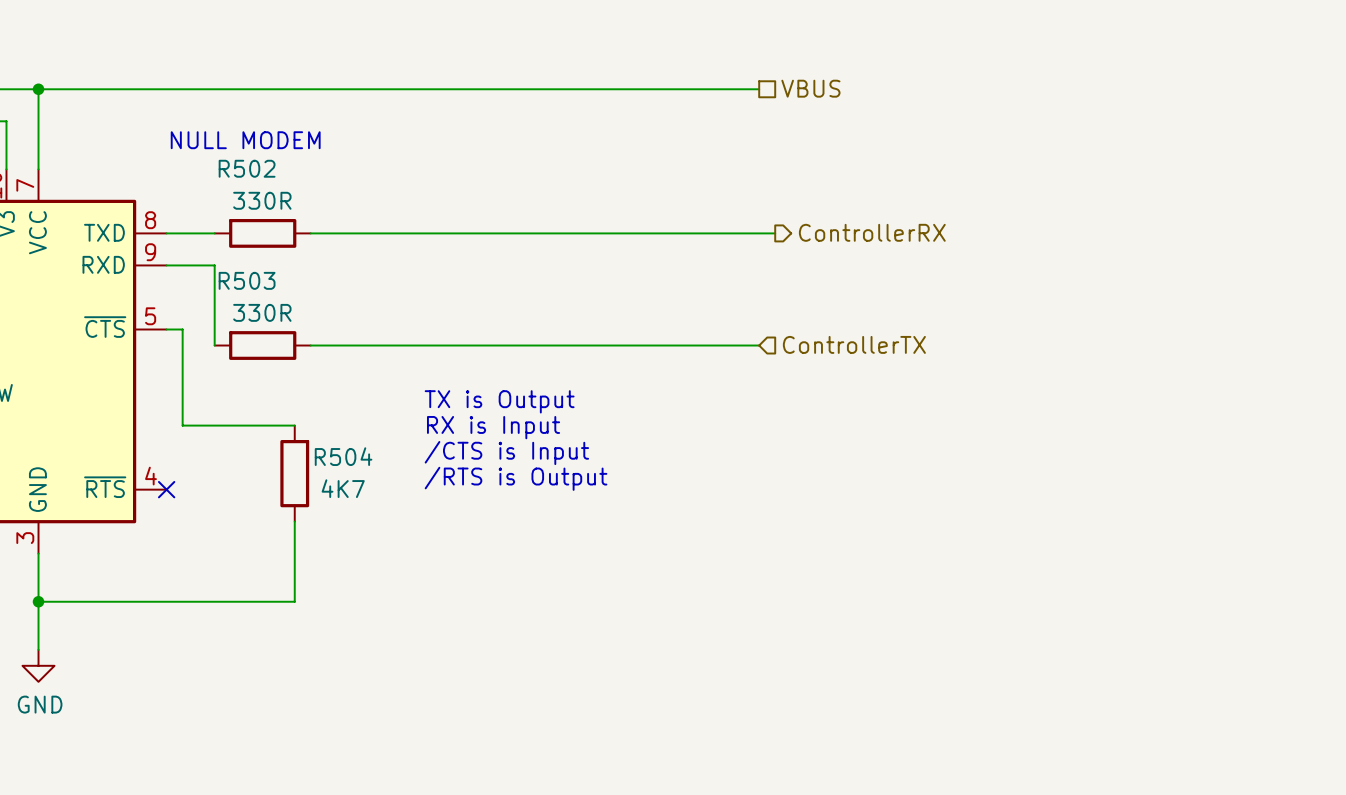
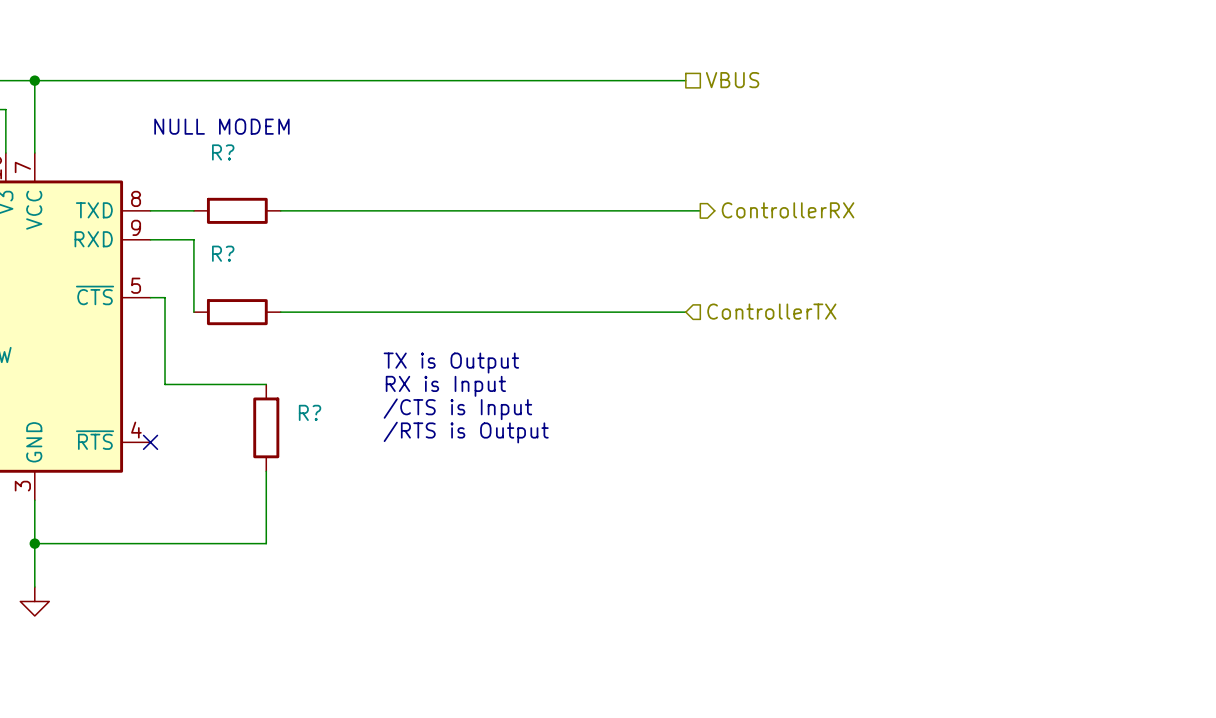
R502 name: R502 (247, 168) -> R? (223, 152)
R502 value: 330R (262, 200) -> none
R503 name: R503 (247, 280) -> R? (223, 253)
R503 value: 330R (262, 312) -> none
R504 name: R504 (343, 456) -> R? (310, 412)
R504 value: 4K7 (343, 488) -> none
power symbol text: GND (40, 704) -> none

